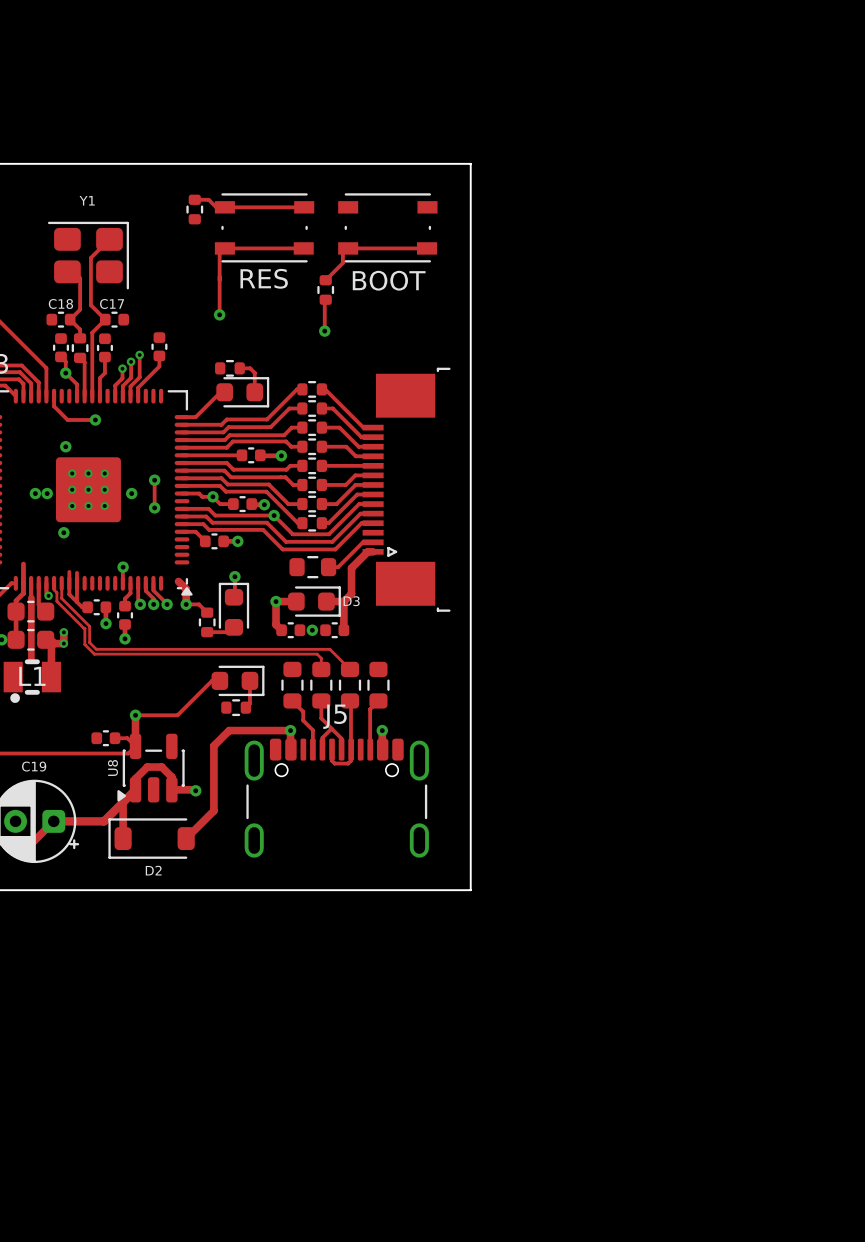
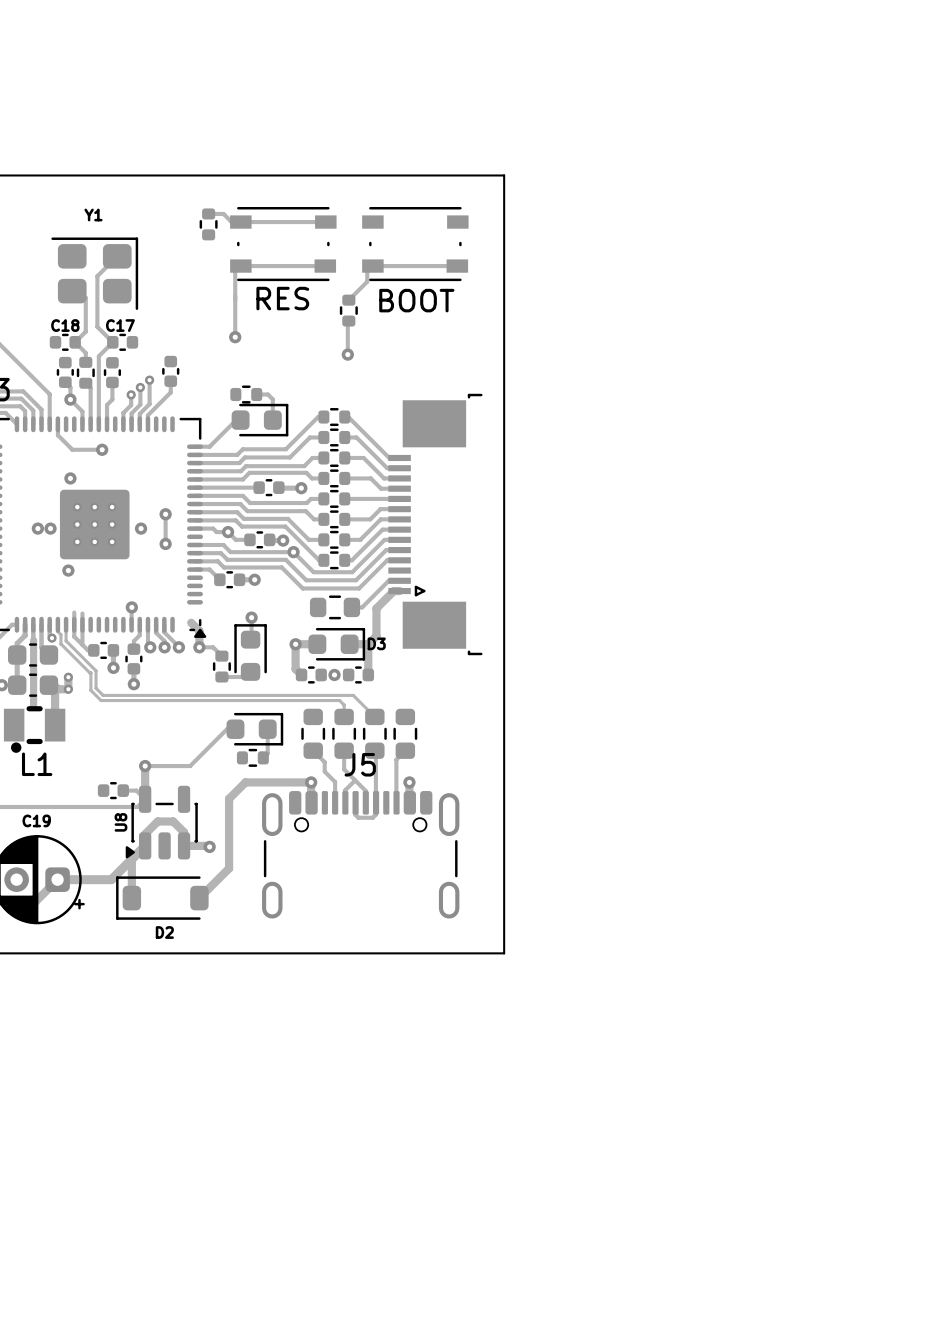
track: (23, 564) (23, 583) -> none
L1 name position: L1 (32, 676) -> L1 (37, 764)

